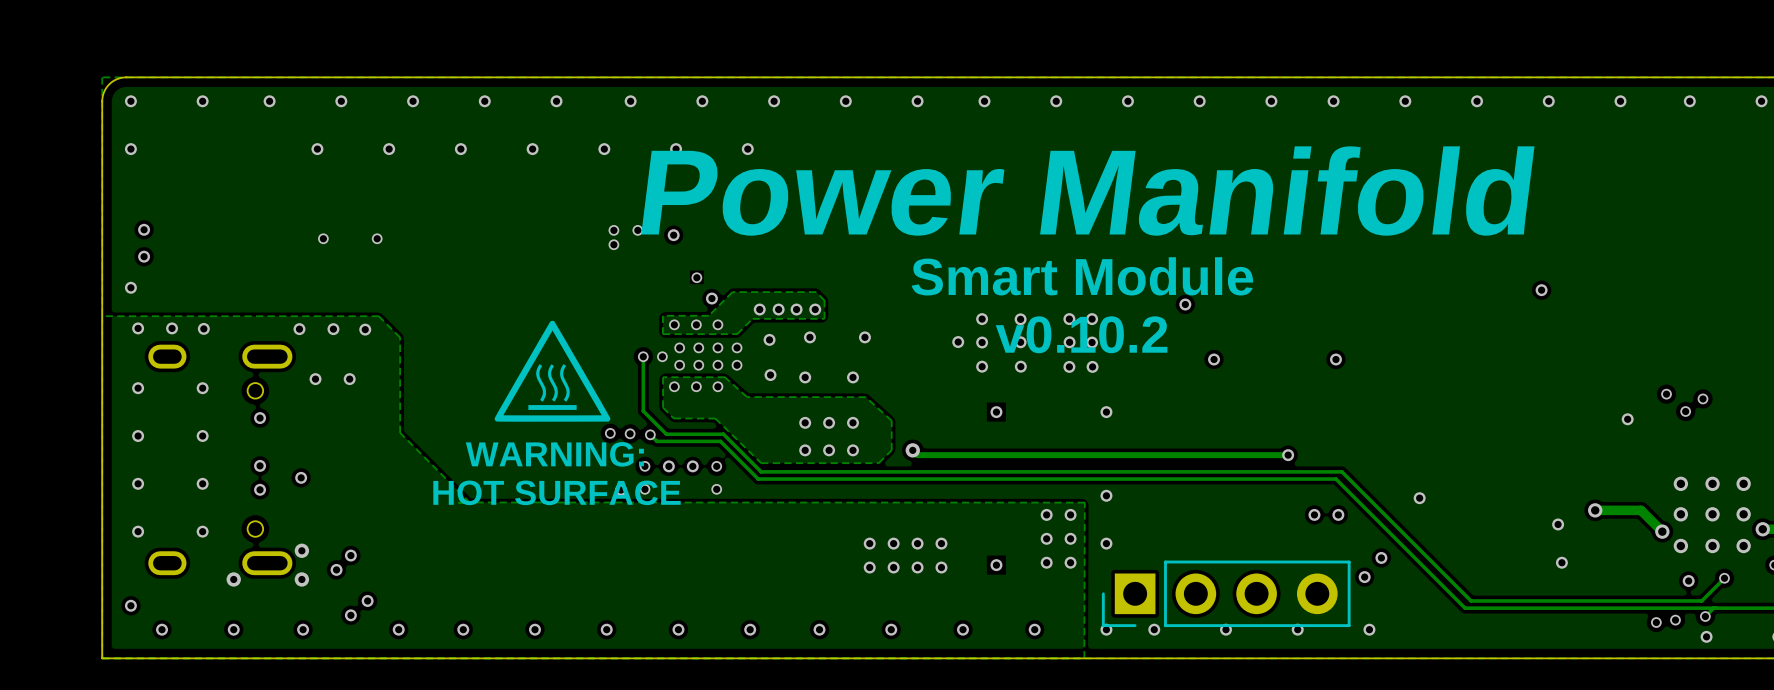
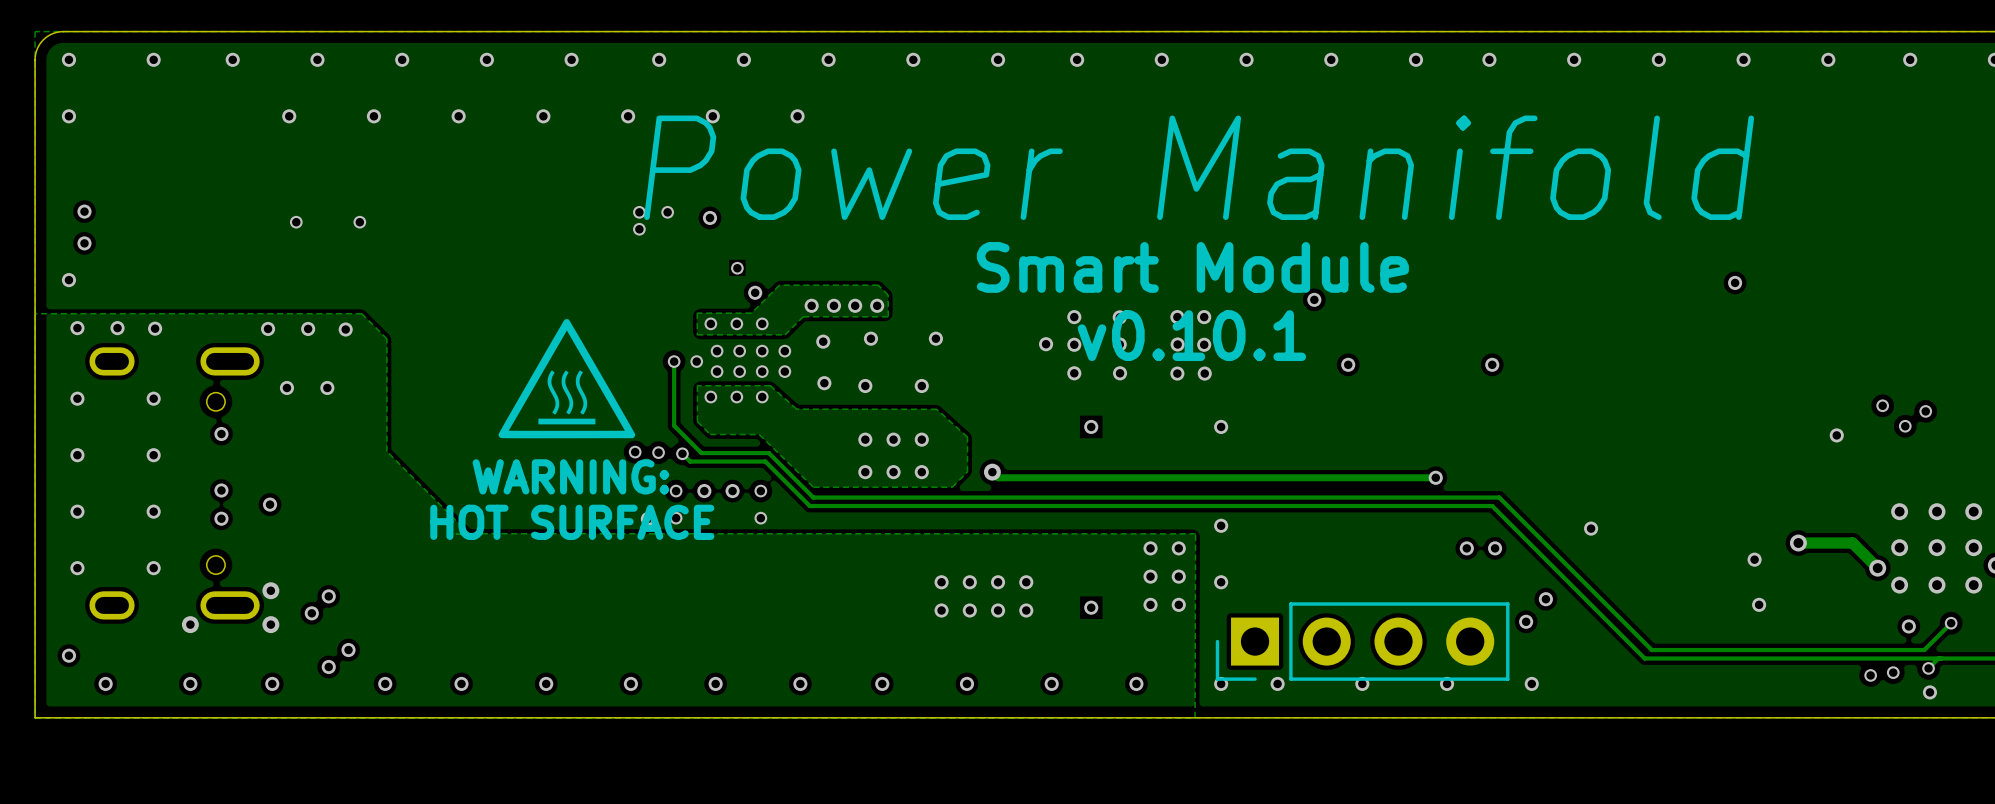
text: v0.10.2 (1081, 334) -> v0.10.1 (1191, 335)

